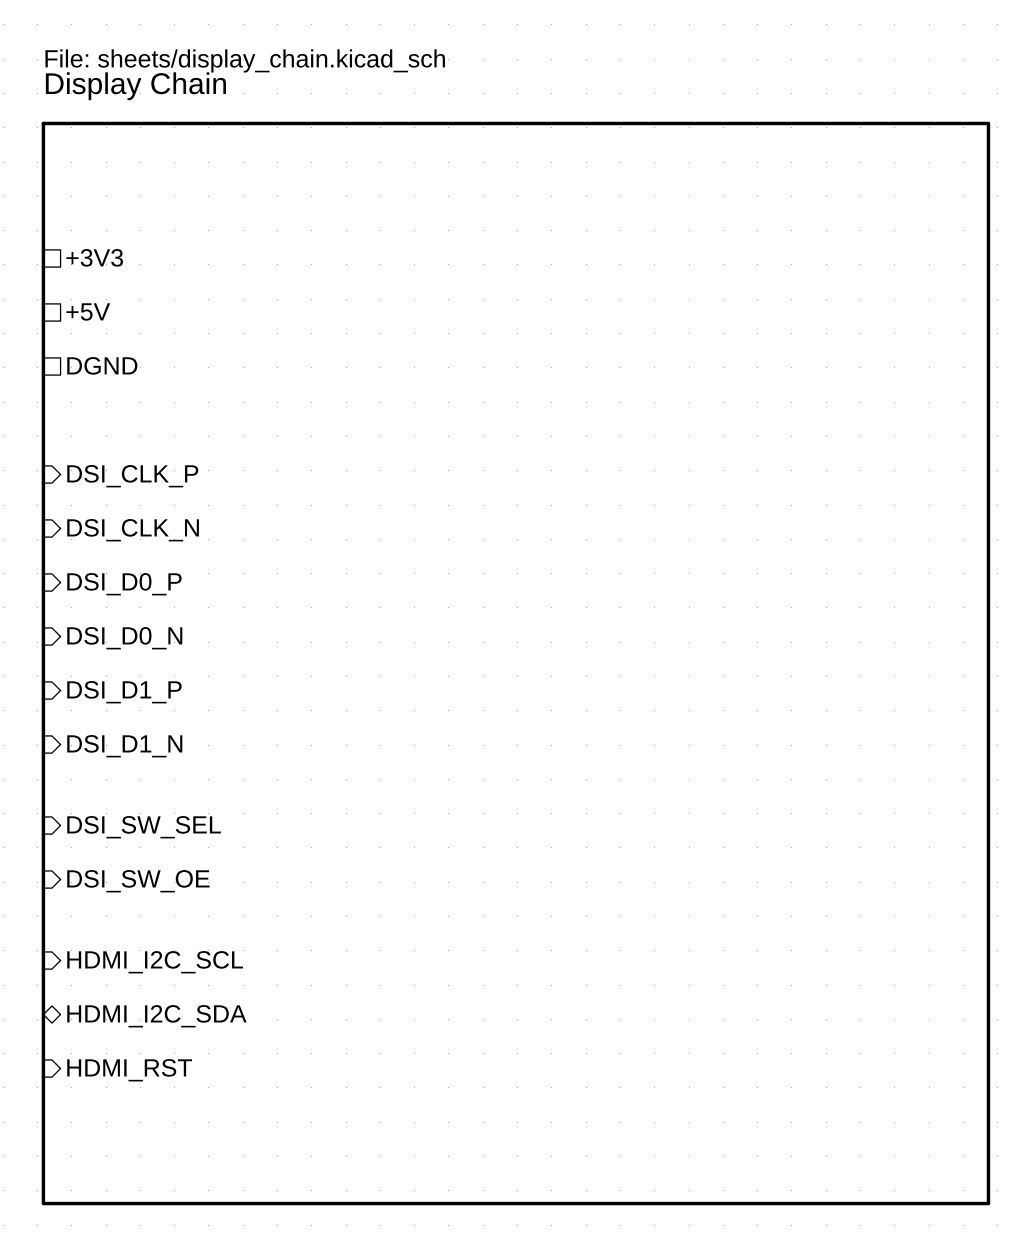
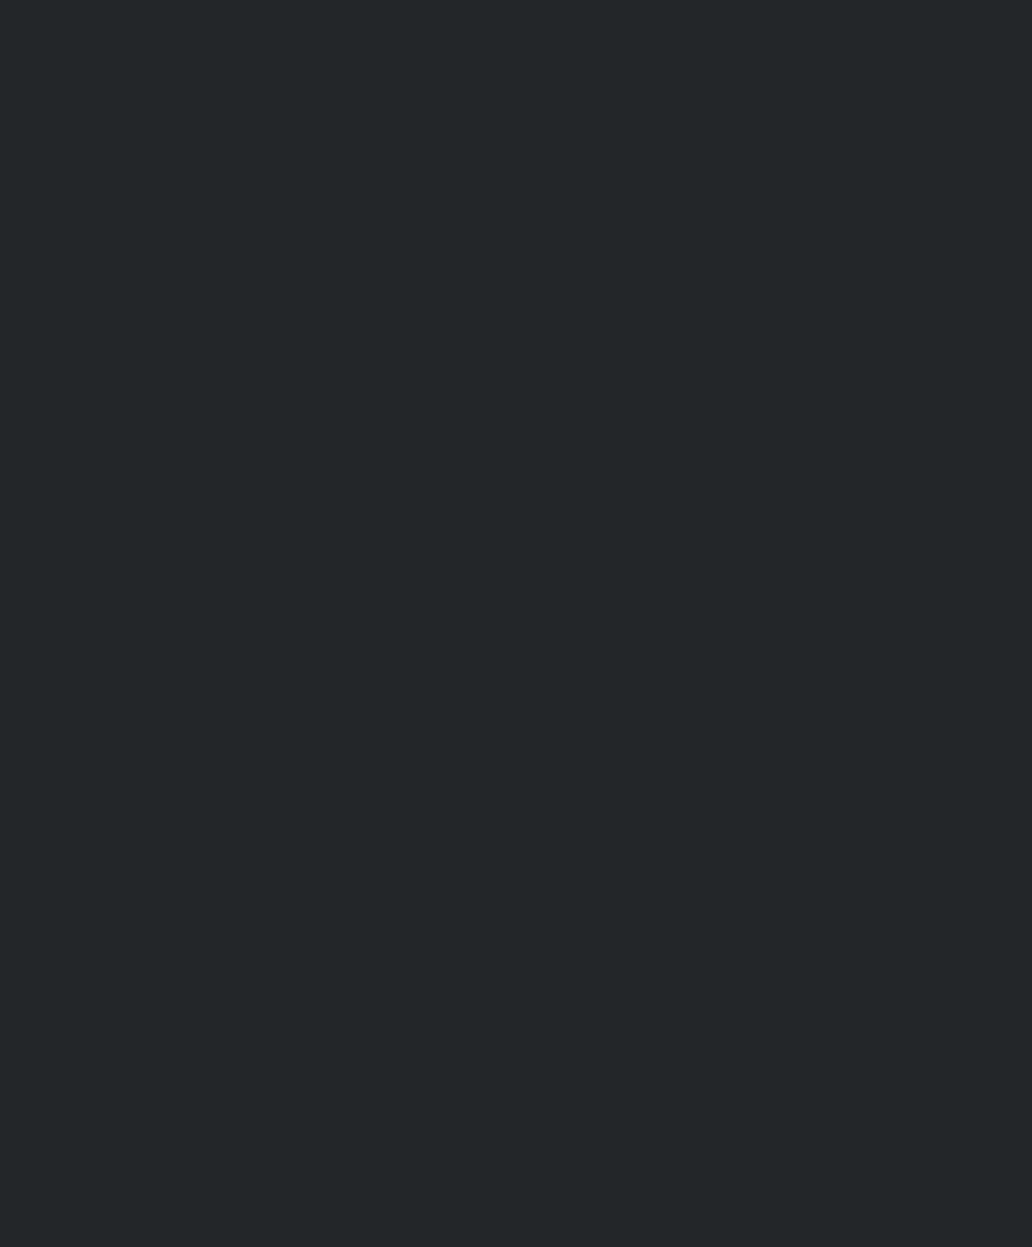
sheet pin: +3V3 (94, 257) -> none
sheet pin: +5V (88, 311) -> none
sheet pin: DGND (102, 365) -> none
sheet pin: DSI_CLK_P (132, 476) -> none
sheet pin: DSI_CLK_N (133, 530) -> none
sheet pin: DSI_D0_P (124, 584) -> none
sheet pin: DSI_D0_N (124, 638) -> none
sheet Display Chain: File: sheets/display_chain.kicad_sch (515, 663) -> none
sheet pin: DSI_D1_P (124, 692) -> none
sheet pin: DSI_D1_N (124, 746) -> none
sheet pin: DSI_SW_SEL (144, 827) -> none
sheet pin: DSI_SW_OE (138, 881) -> none
sheet pin: HDMI_I2C_SCL (155, 962) -> none
sheet pin: HDMI_I2C_SDA (156, 1016) -> none
sheet pin: HDMI_RST (129, 1070) -> none

